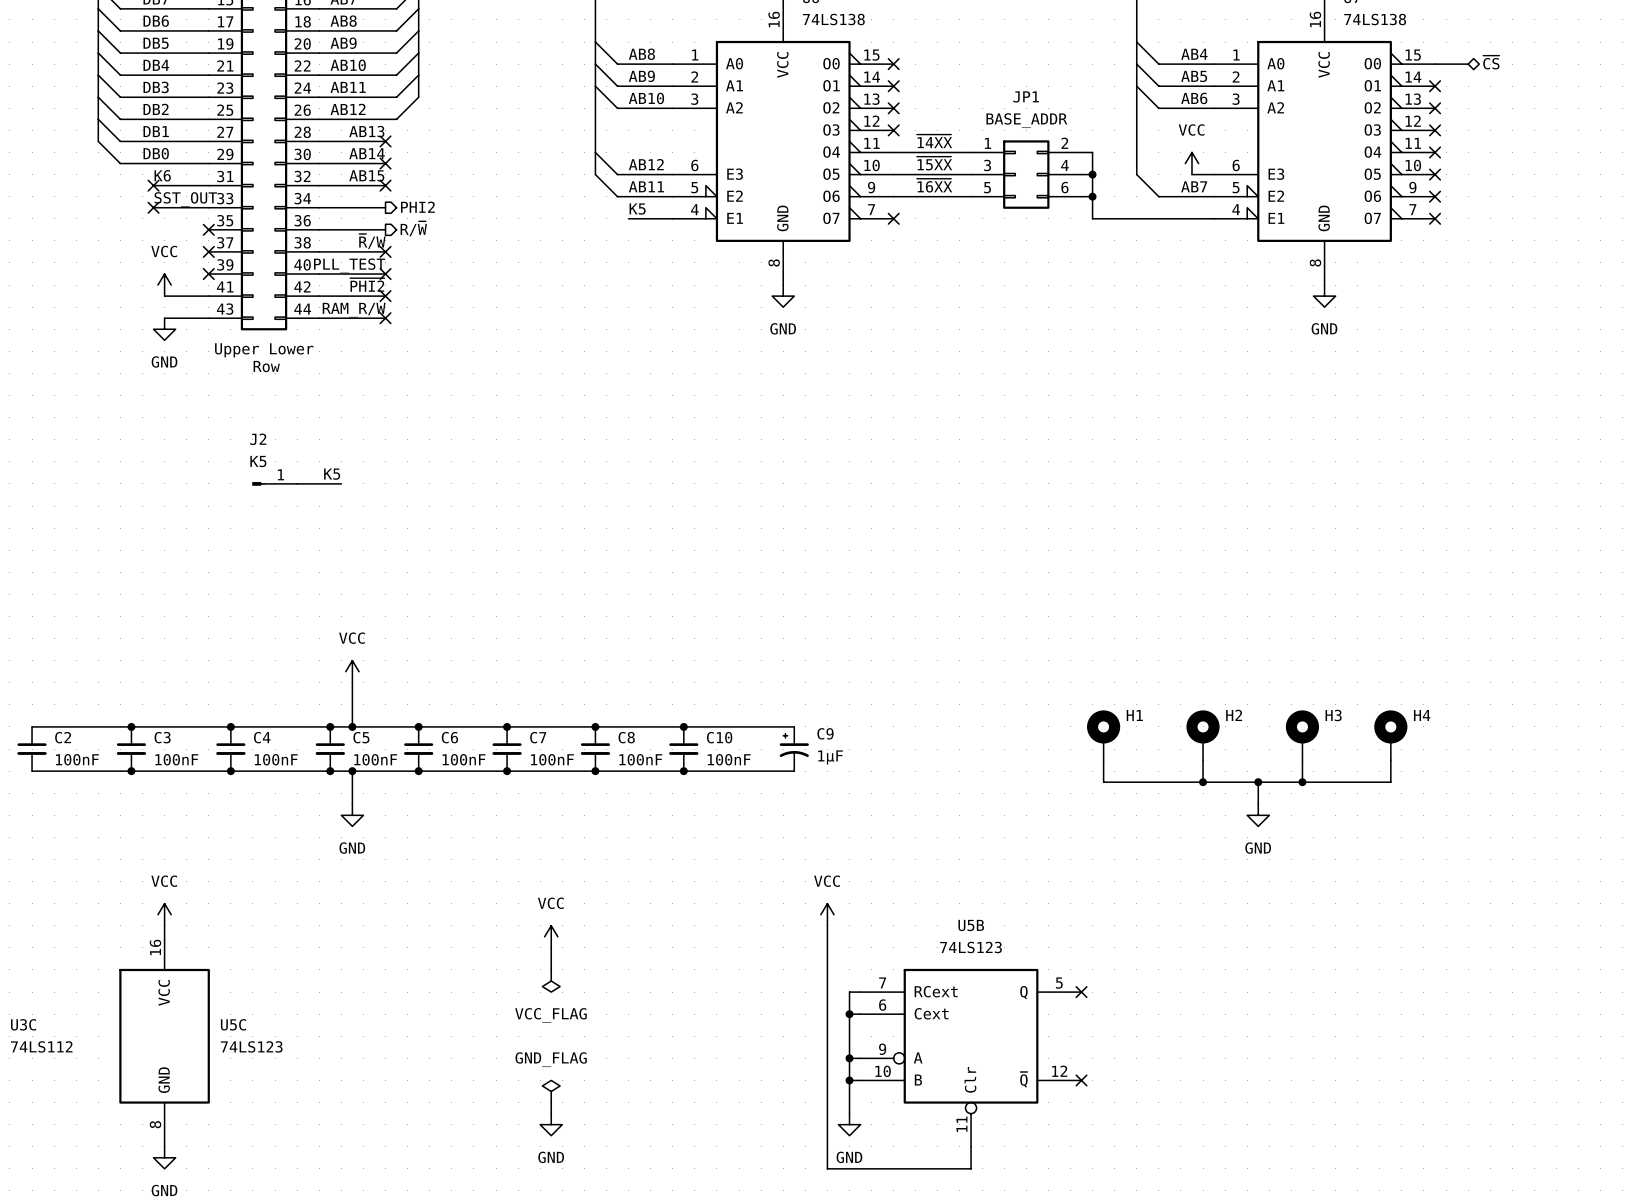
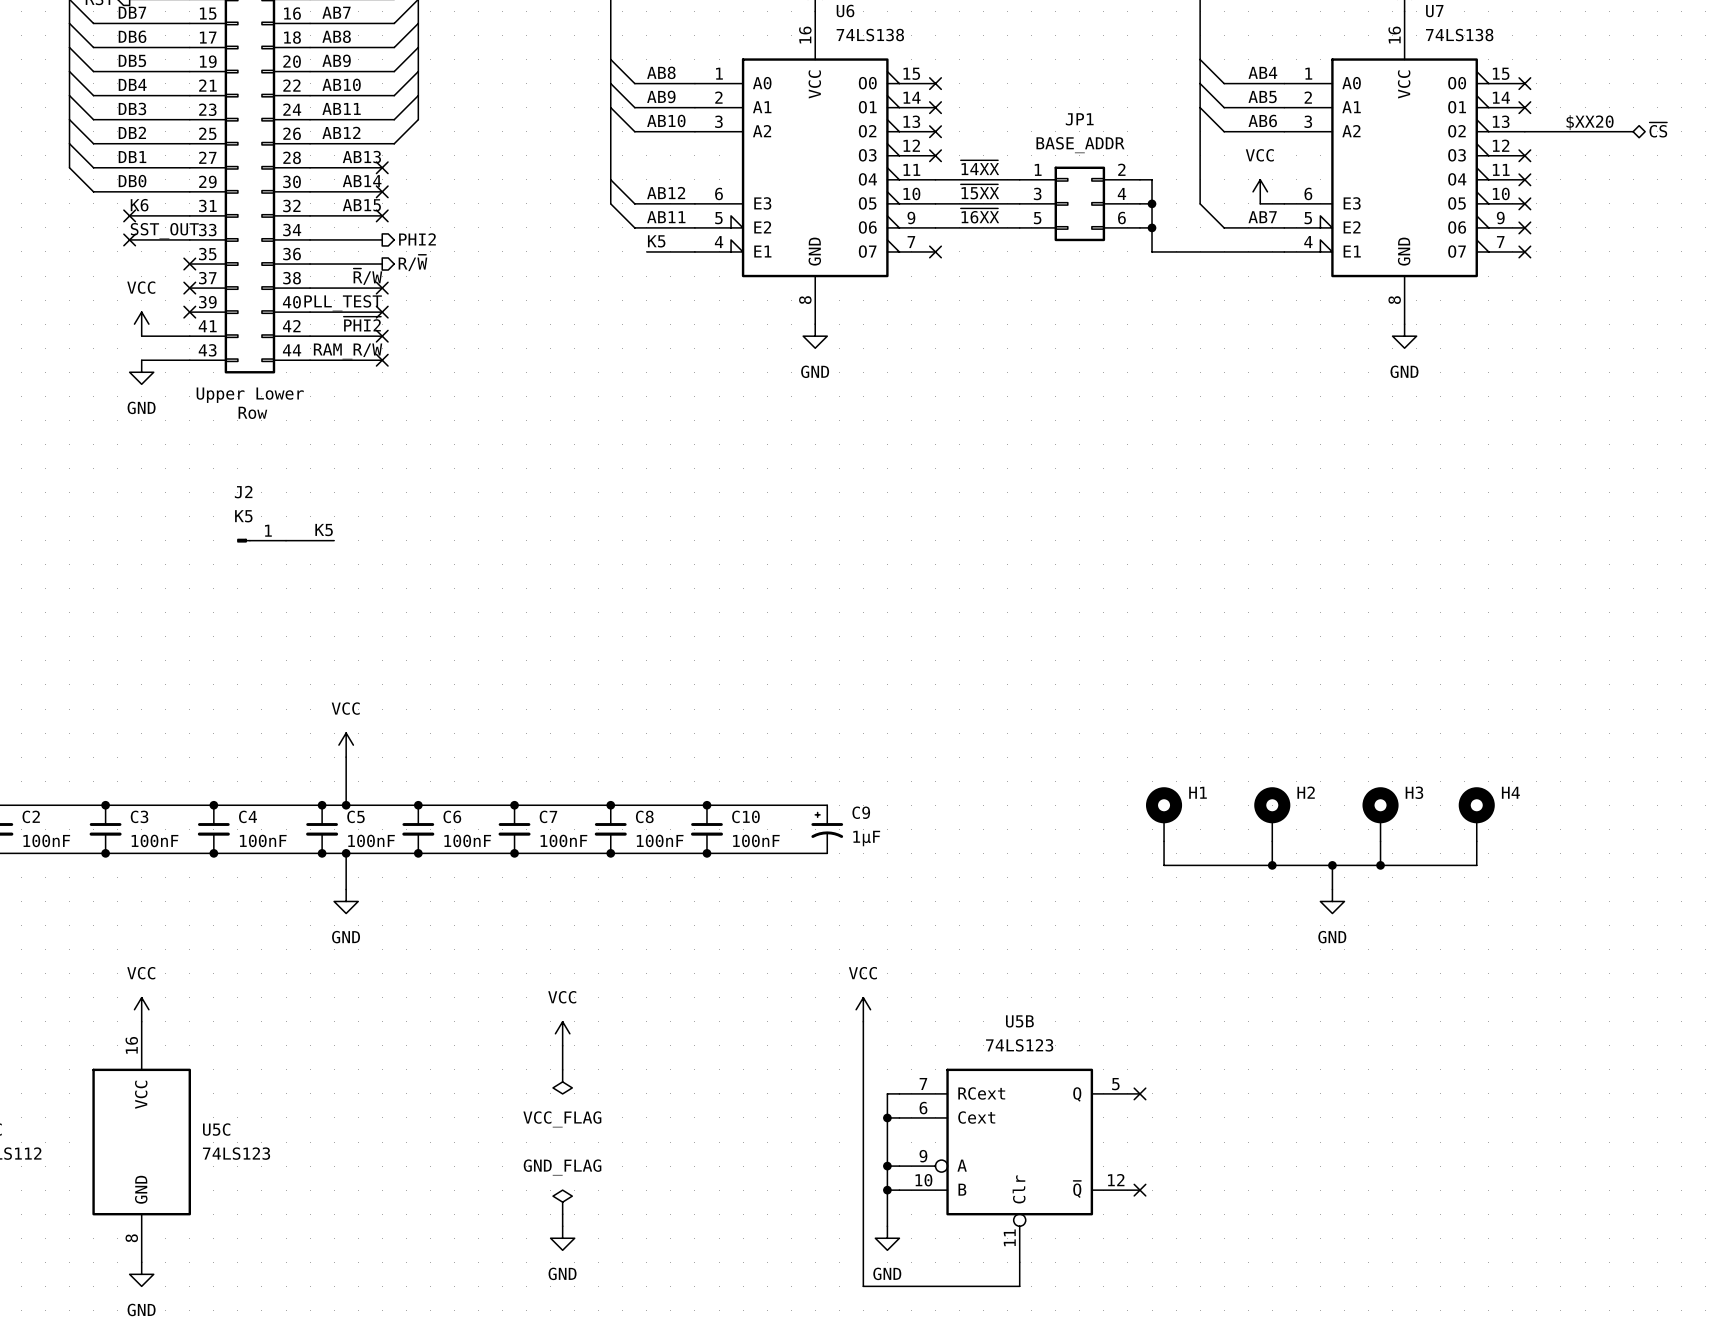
hierarchical label position: ~{CS} (1491, 62) -> ~{CS} (1658, 129)
wire: (1435, 64) (1468, 64) -> none
text: none -> $XX20 (1590, 122)
wire: none -> (1524, 131) (1633, 131)
no-connect mark position: (1435, 108) -> (1524, 83)

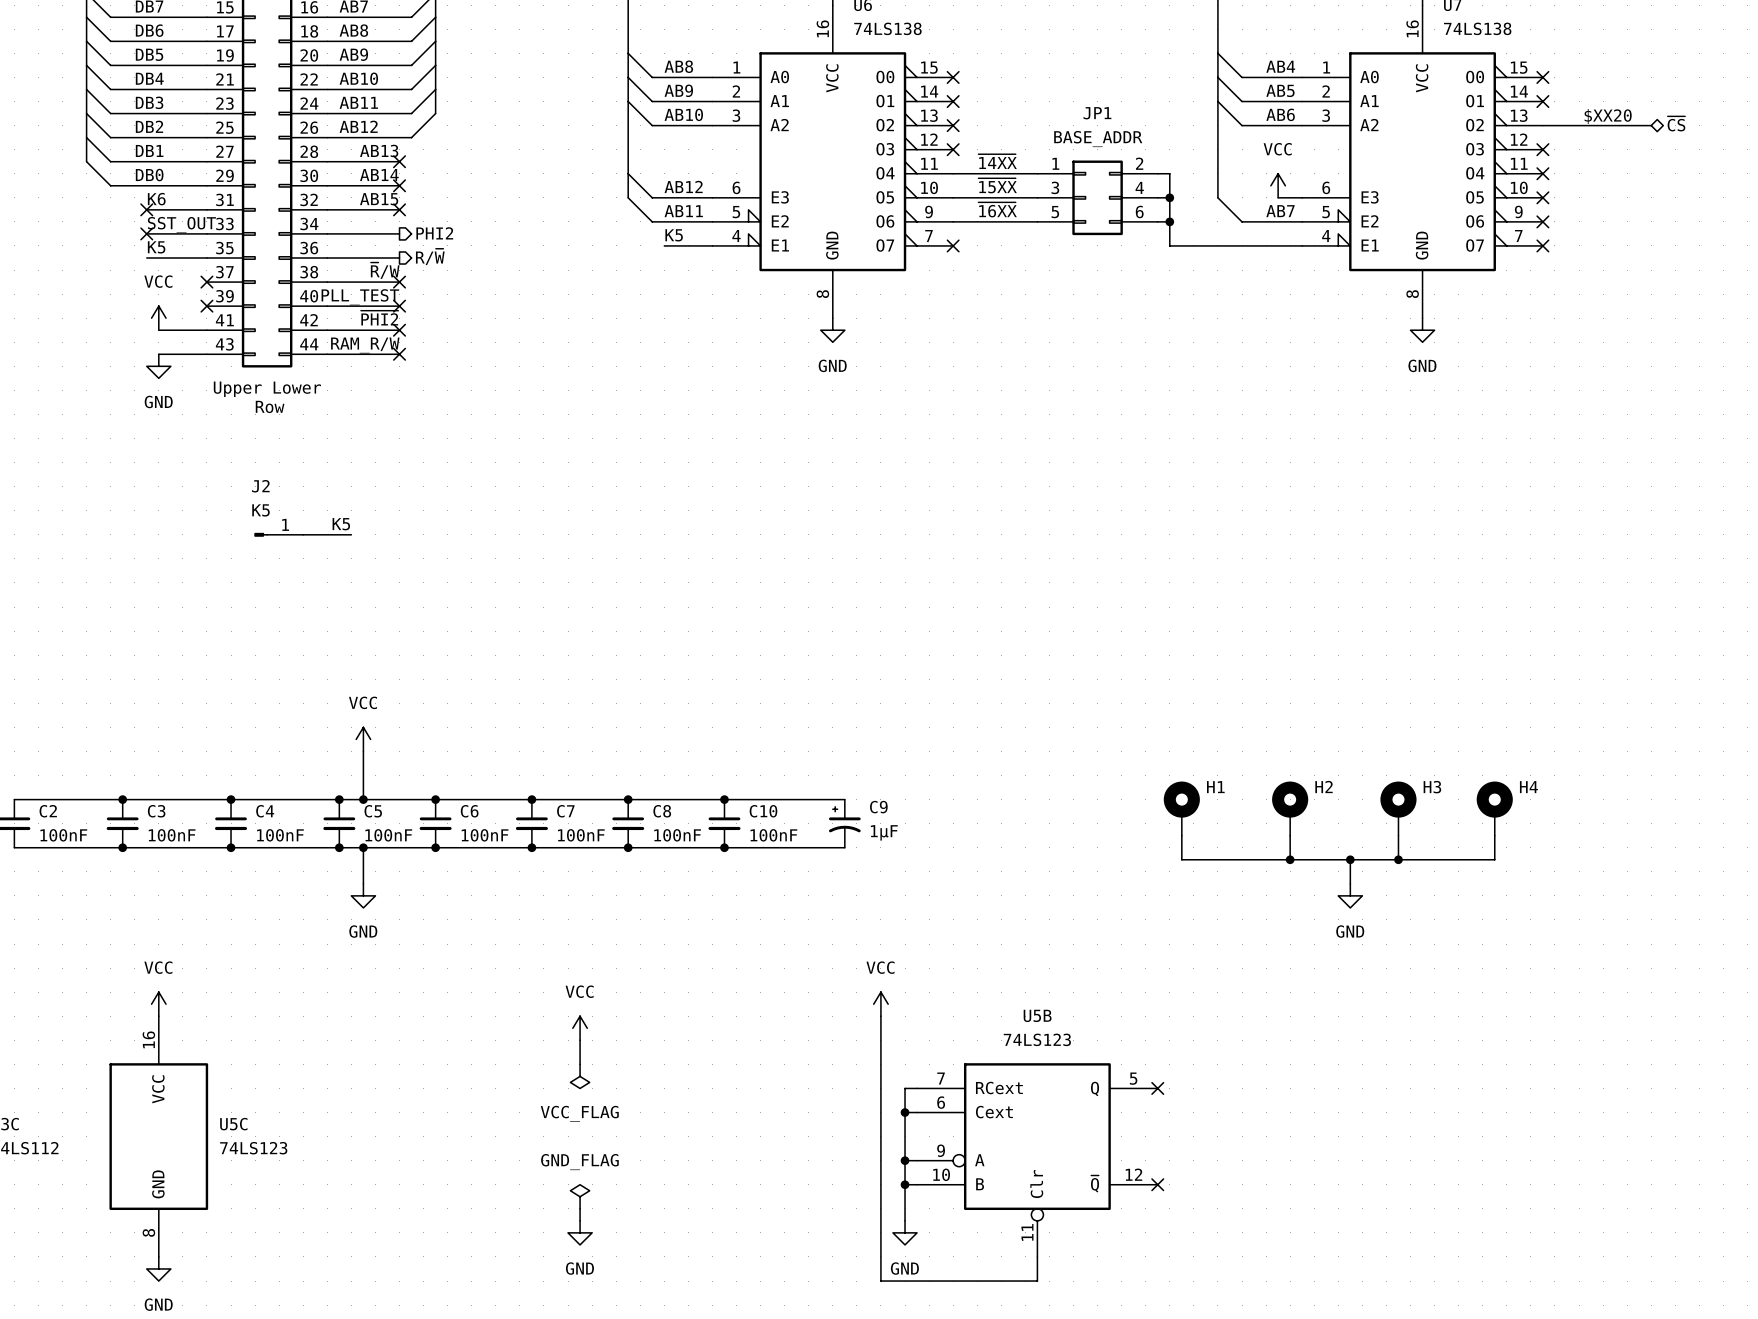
label: none -> K5 (156, 247)
wire: none -> (146, 257) (206, 257)
no-connect mark: (189, 264) -> none

